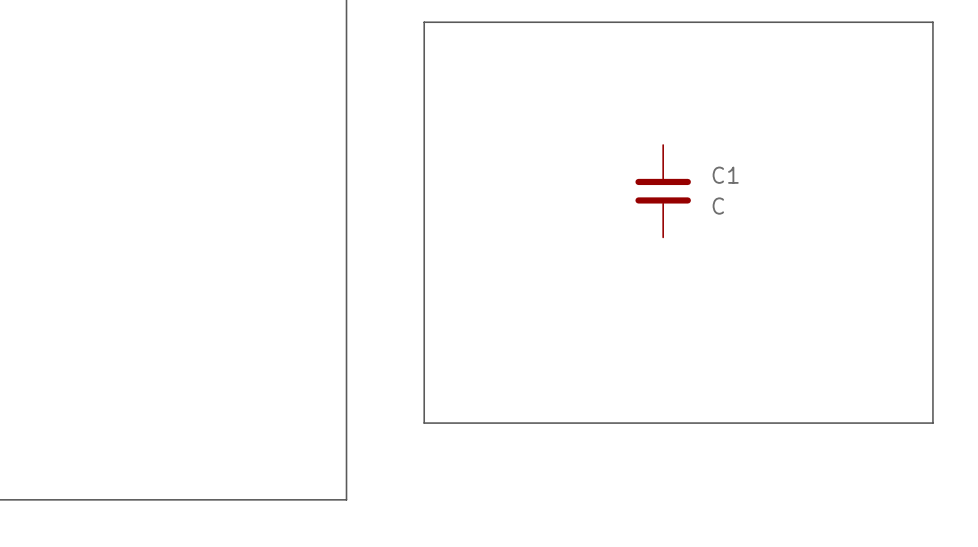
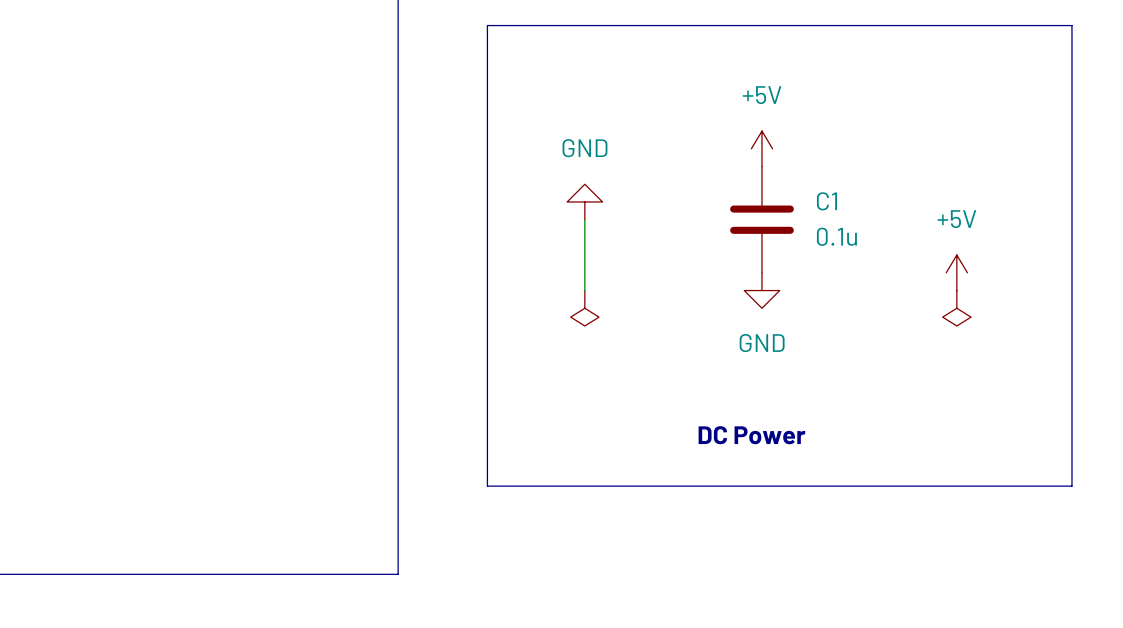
power symbol: none -> +5V (761, 148)
power symbol: none -> GND (584, 201)
wire: none -> (584, 219) (584, 290)
C1 value: C (718, 206) -> 0.1u (836, 236)
power symbol: none -> +5V (956, 272)
power symbol: none -> GND (761, 290)
power symbol: none -> (584, 308)
power symbol: none -> (956, 308)
text: none -> DC Power (752, 435)

